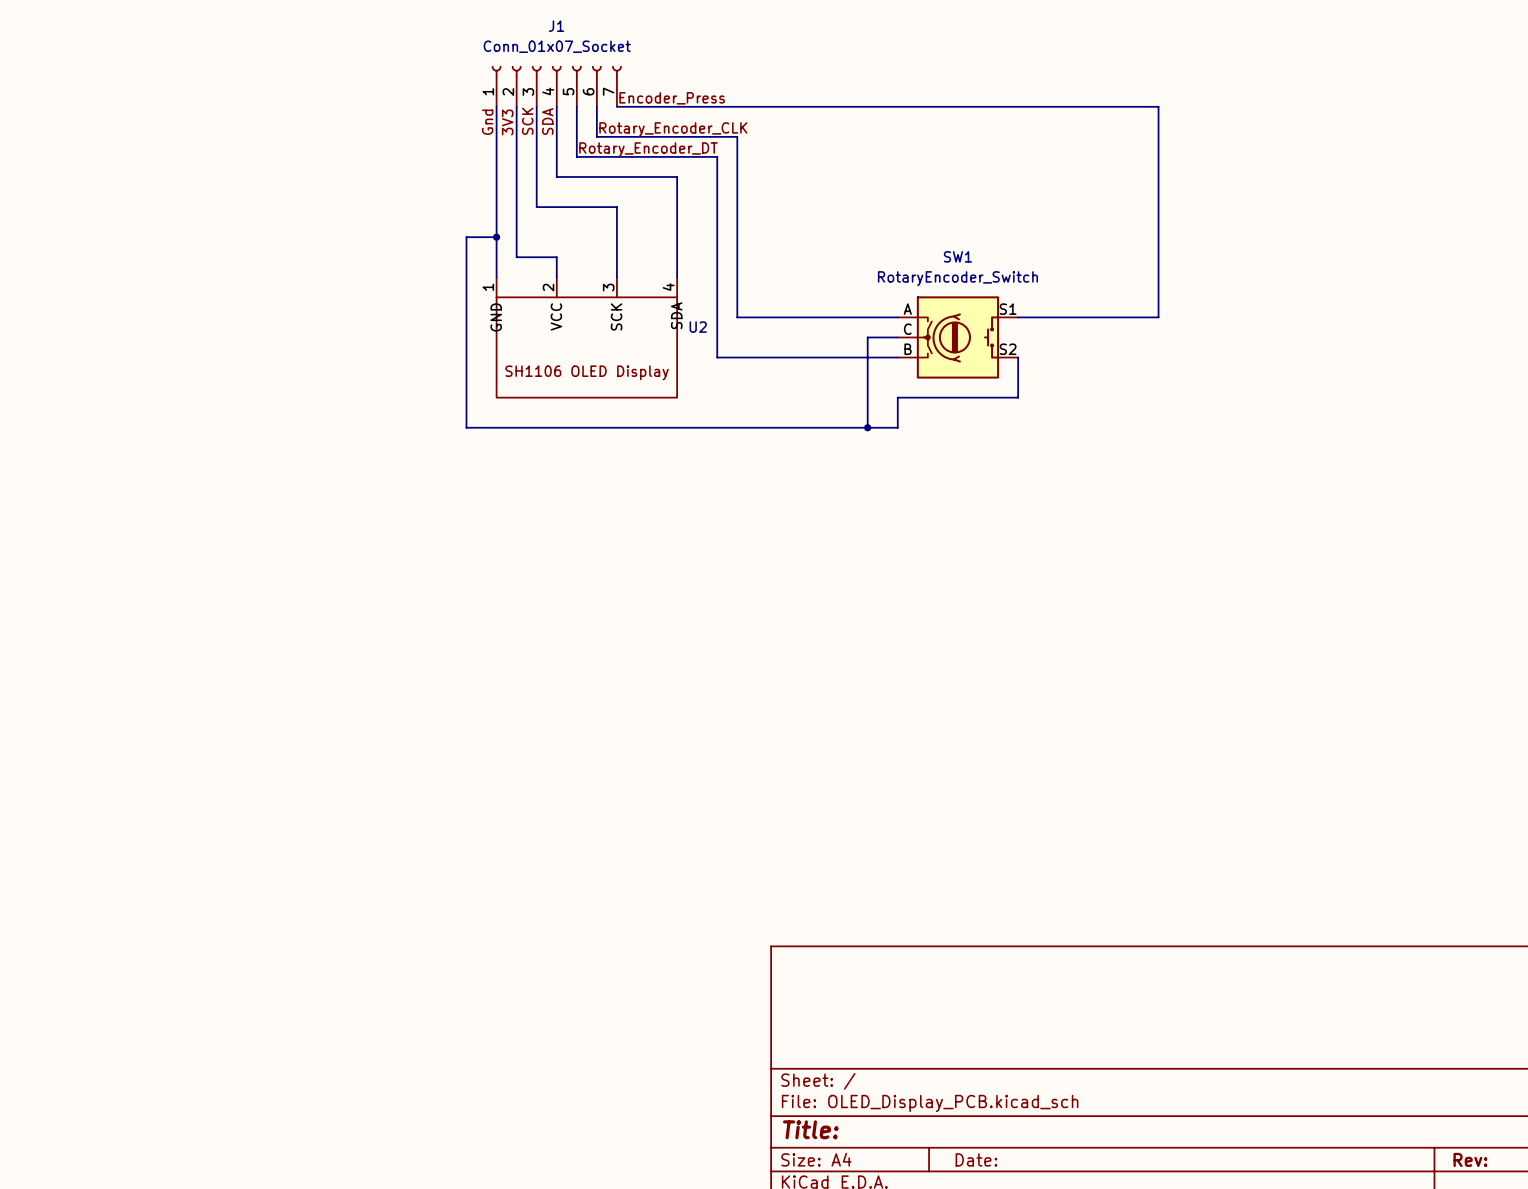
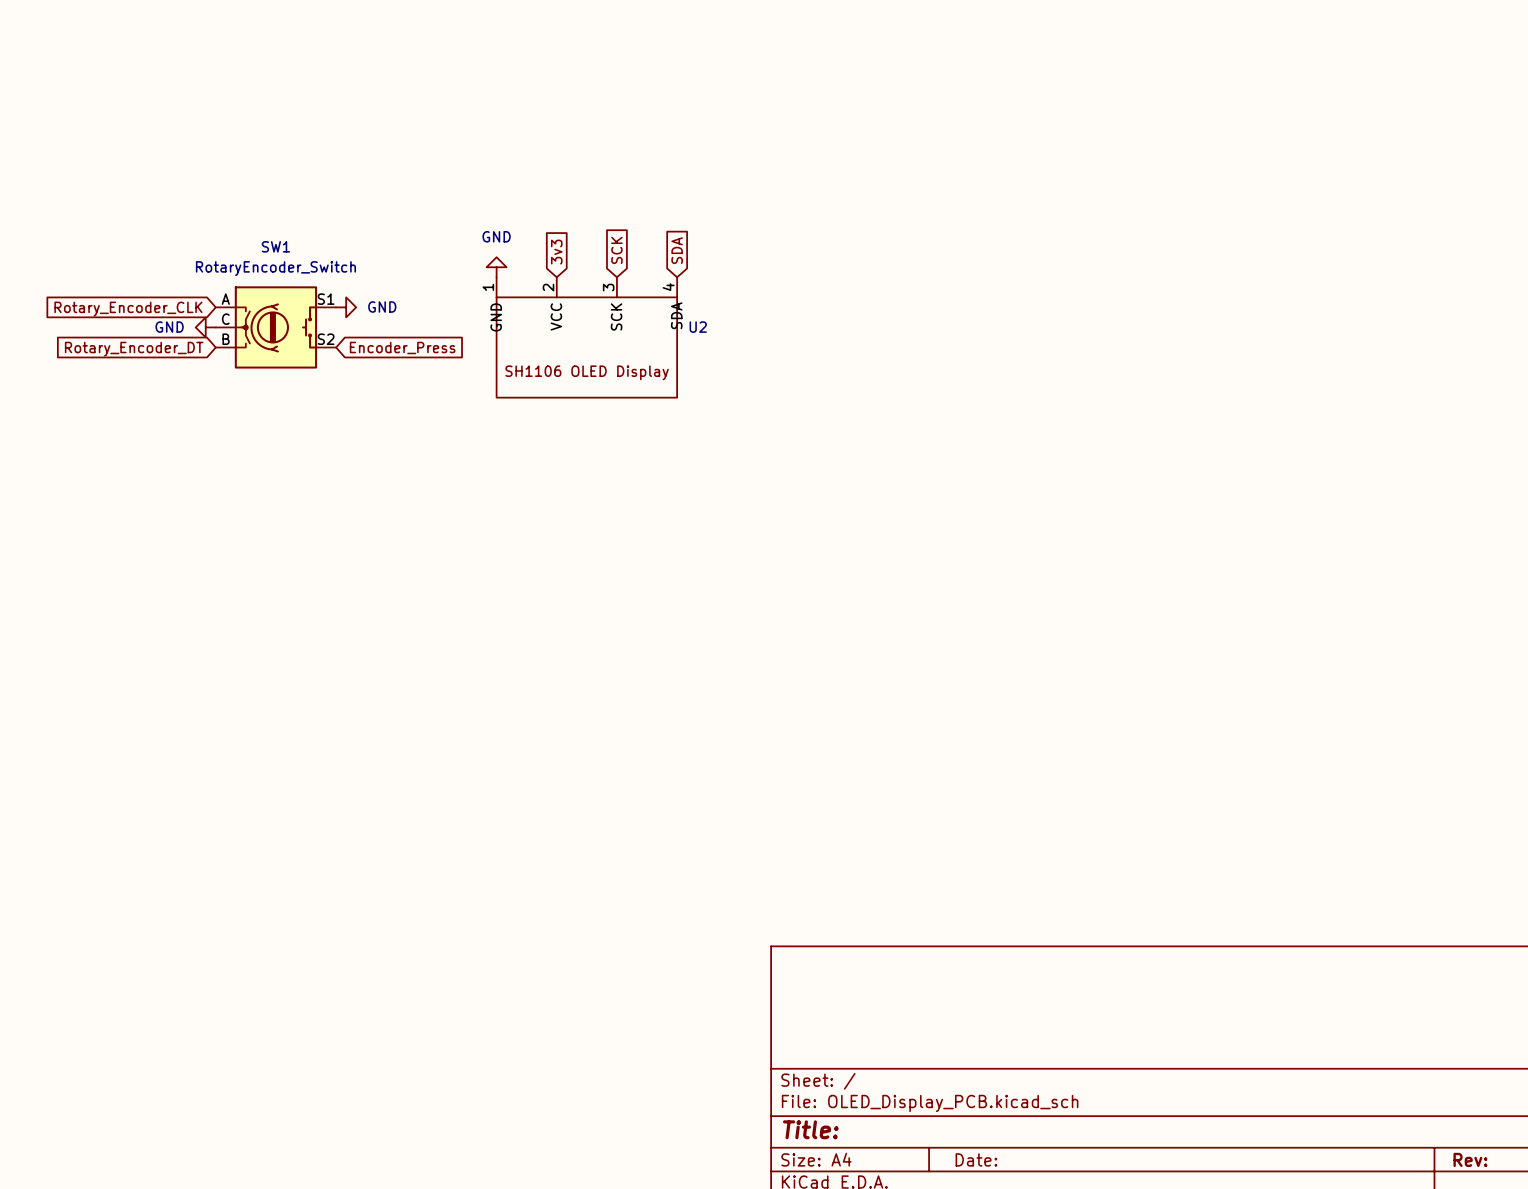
J1: Conn_01x07_Socket (556, 86) -> none
label: Encoder_Press (672, 98) -> none
wire: (496, 106) (496, 277) -> none
wire: (516, 106) (516, 257) (556, 257) (556, 277) -> none
wire: (536, 106) (536, 207) (616, 207) (616, 277) -> none
wire: (556, 106) (556, 177) (677, 177) (677, 277) -> none
wire: (576, 106) (576, 156) (717, 156) (717, 357) (897, 357) -> none
wire: (596, 106) (596, 136) (737, 136) (737, 317) (897, 317) -> none
wire: (616, 106) (1158, 106) (1158, 317) (1018, 317) -> none
label: SCK (527, 121) -> none
label: SDA (547, 121) -> none
label: Gnd (487, 122) -> none
label: 3V3 (507, 122) -> none
label: Rotary_Encoder_CLK (673, 129) -> none
label: Rotary_Encoder_DT (648, 149) -> none
wire: (496, 237) (466, 237) (466, 427) (897, 427) (897, 397) (1018, 397) (1018, 357) -> none
junction: (496, 237) -> none
global label: none -> SCK (616, 250)
global label: none -> SDA (677, 250)
global label: none -> 3v3 (556, 252)
power symbol: none -> GND (496, 267)
power symbol: none -> GND (346, 307)
global label: none -> Rotary_Encoder_CLK (128, 309)
power symbol: none -> GND (205, 327)
wire: (897, 337) (867, 337) (867, 427) -> none
SW1 position: (957, 337) -> (275, 327)
global label: none -> Encoder_Press (402, 347)
global label: none -> Rotary_Encoder_DT (134, 349)
junction: (867, 427) -> none

